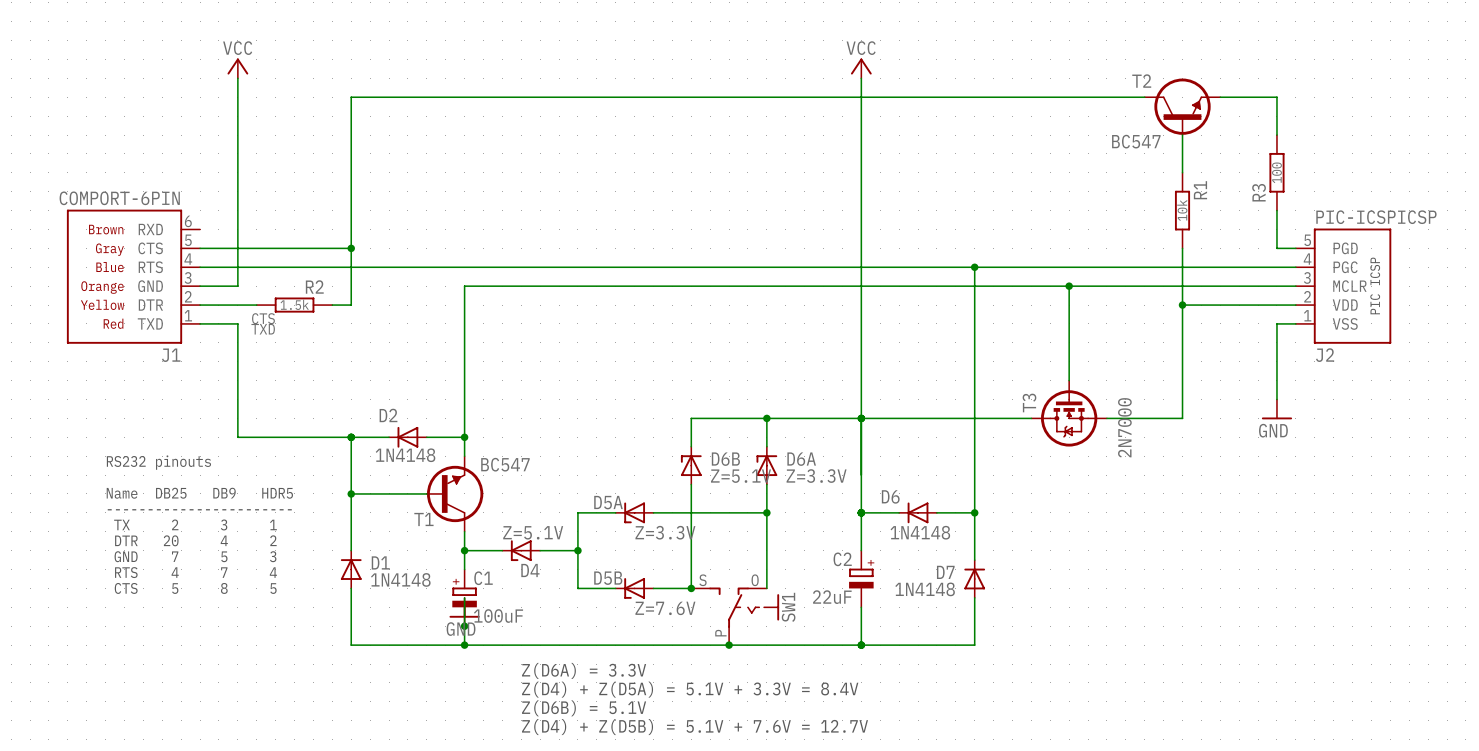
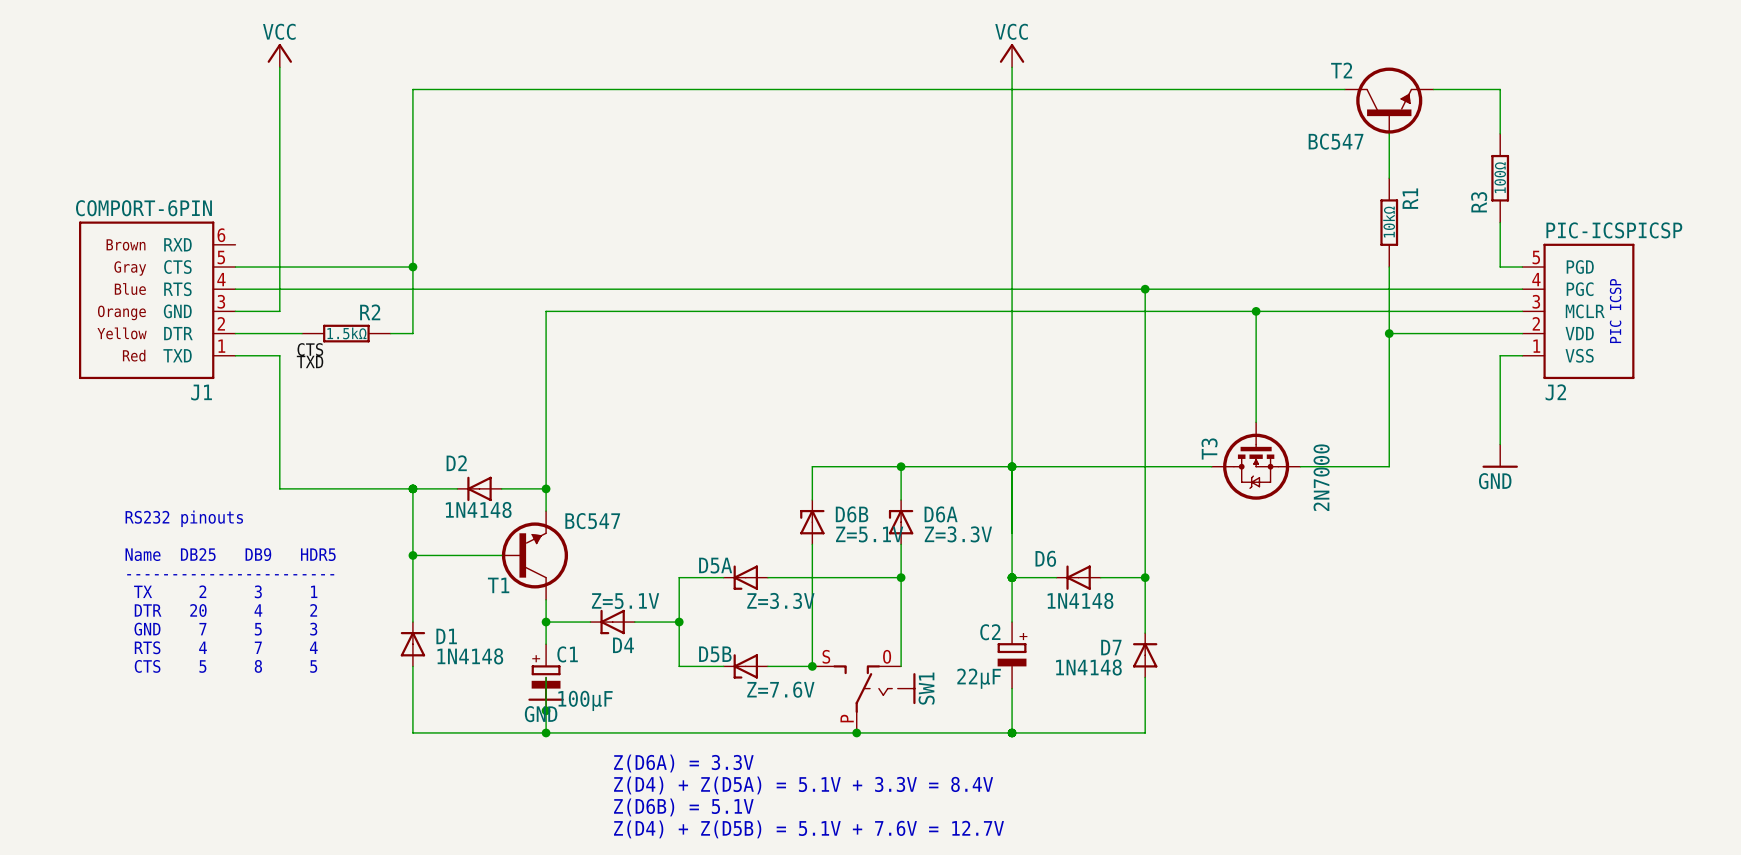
R3 value: 100 (1276, 172) -> 100Ω (1500, 177)
R1 value: 10k (1182, 210) -> 10kΩ (1389, 222)
R2 value: 1.5k (294, 304) -> 1.5kΩ (346, 333)
C2 value: 22uF (832, 597) -> 22μF (979, 678)
C1 value: 100uF (498, 616) -> 100μF (585, 700)

